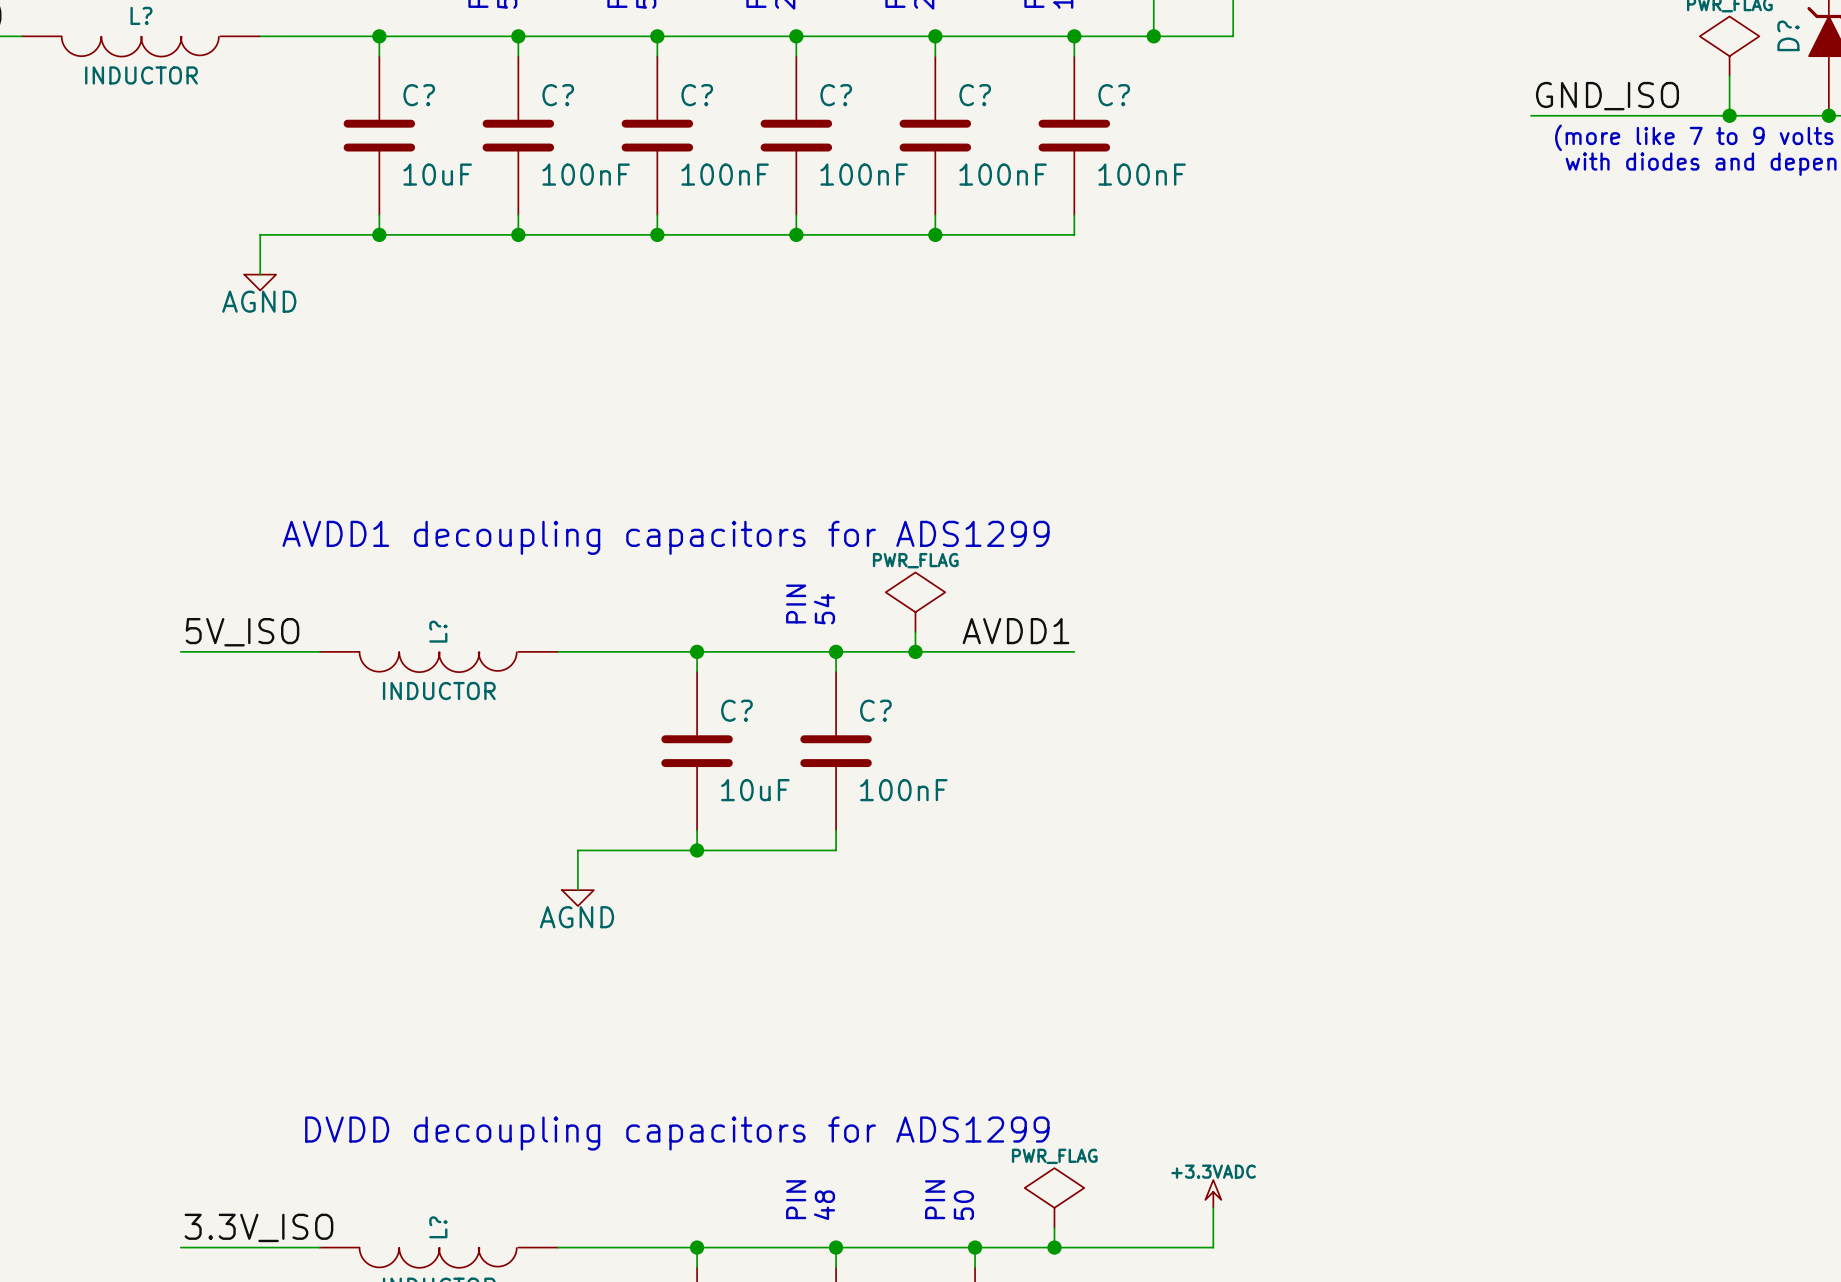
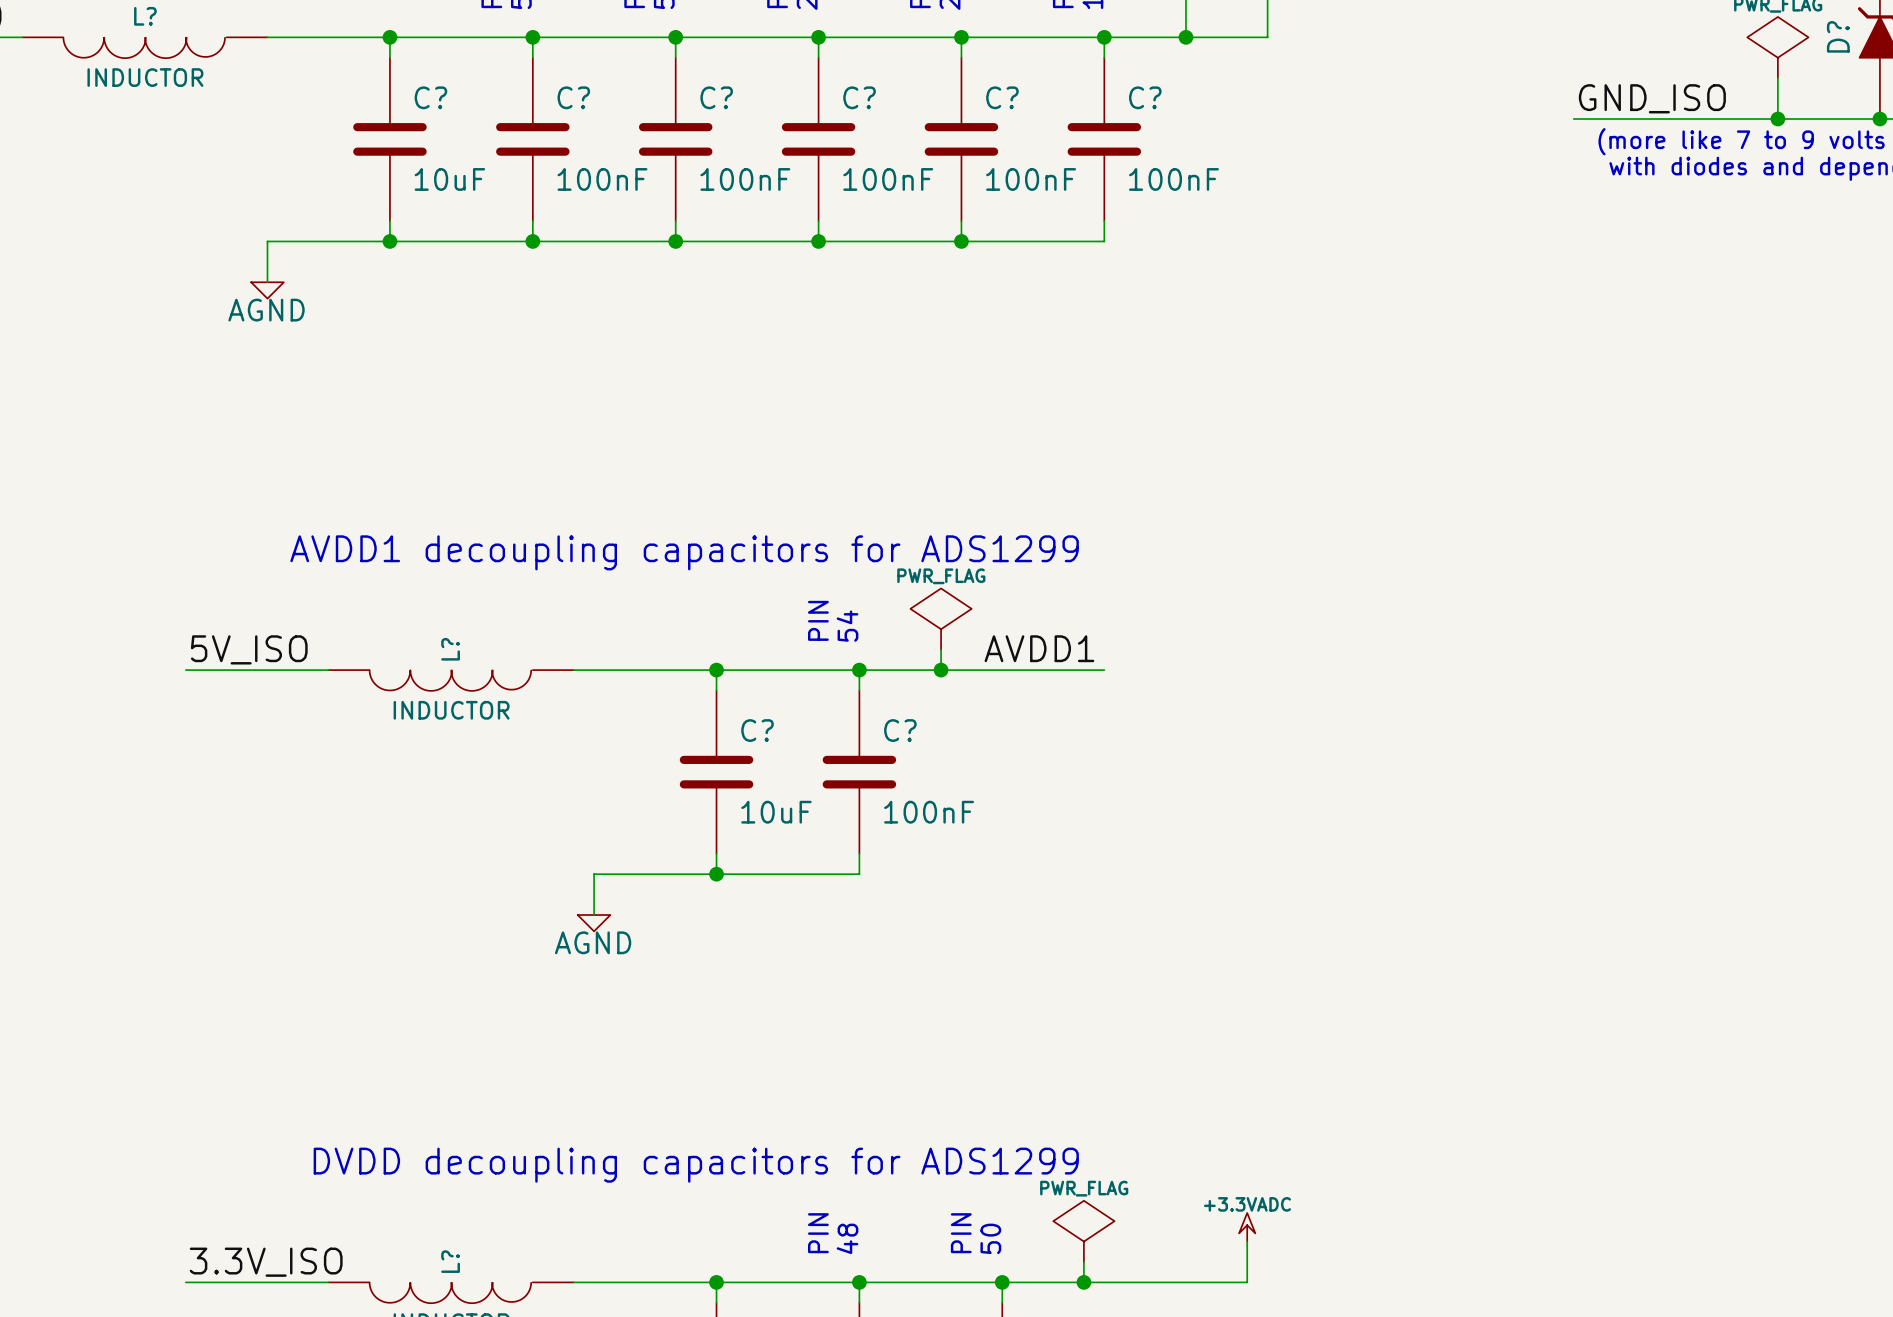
label position: AVDD1 (1016, 631) -> AVDD1 (1039, 648)

